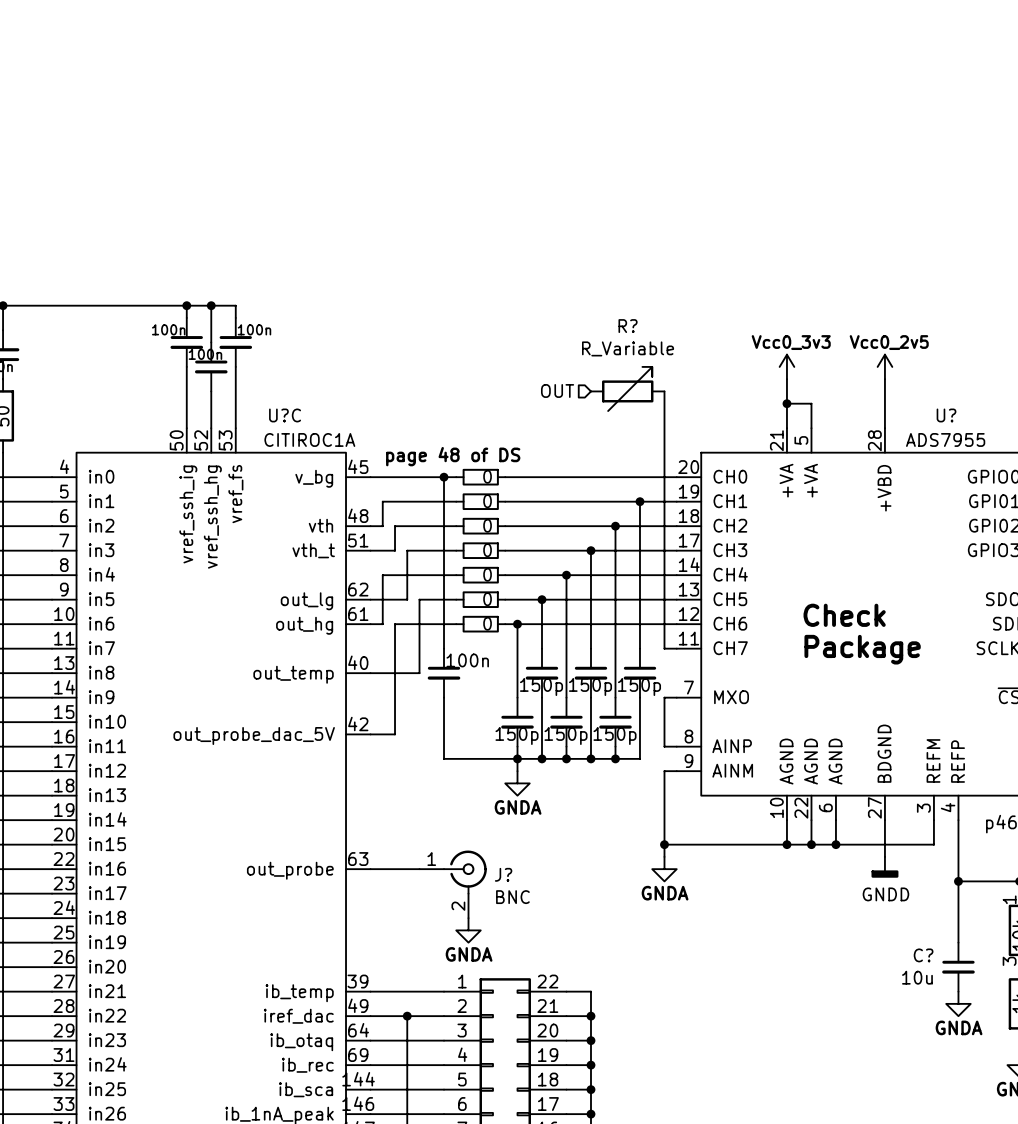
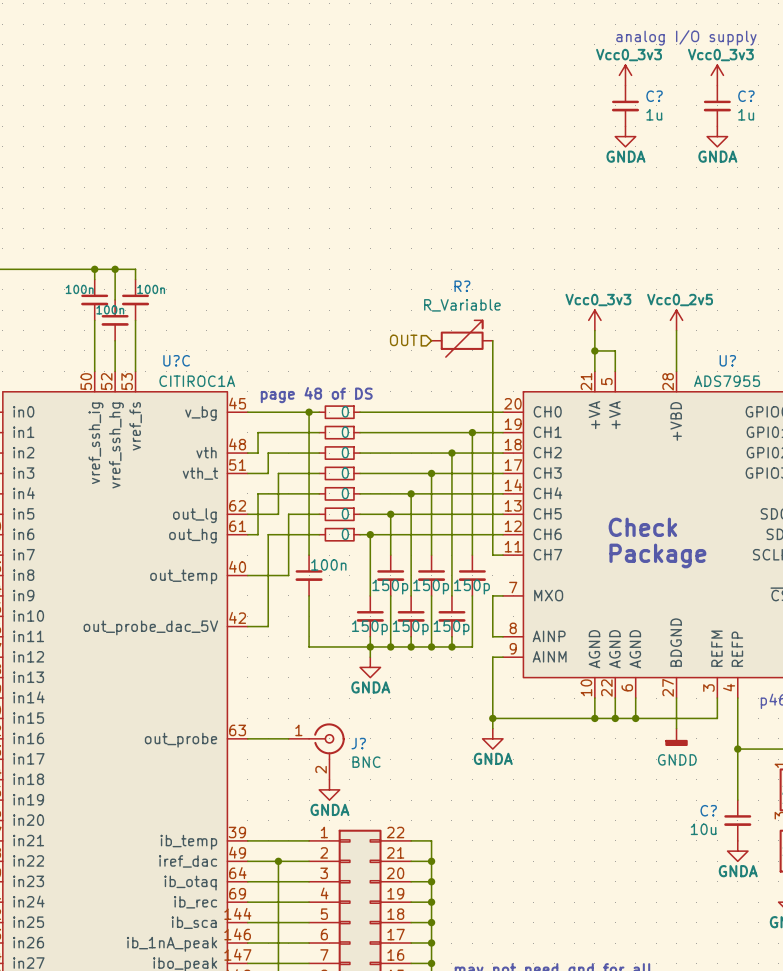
text: none -> analog I/O supply (686, 37)
part: none -> Vcc0_3v3 (625, 75)
part: none -> Vcc0_3v3 (717, 75)
C?: none -> 1u (625, 105)
C?: none -> 1u (717, 105)
power symbol: none -> GNDA (625, 136)
power symbol: none -> GNDA (717, 136)

